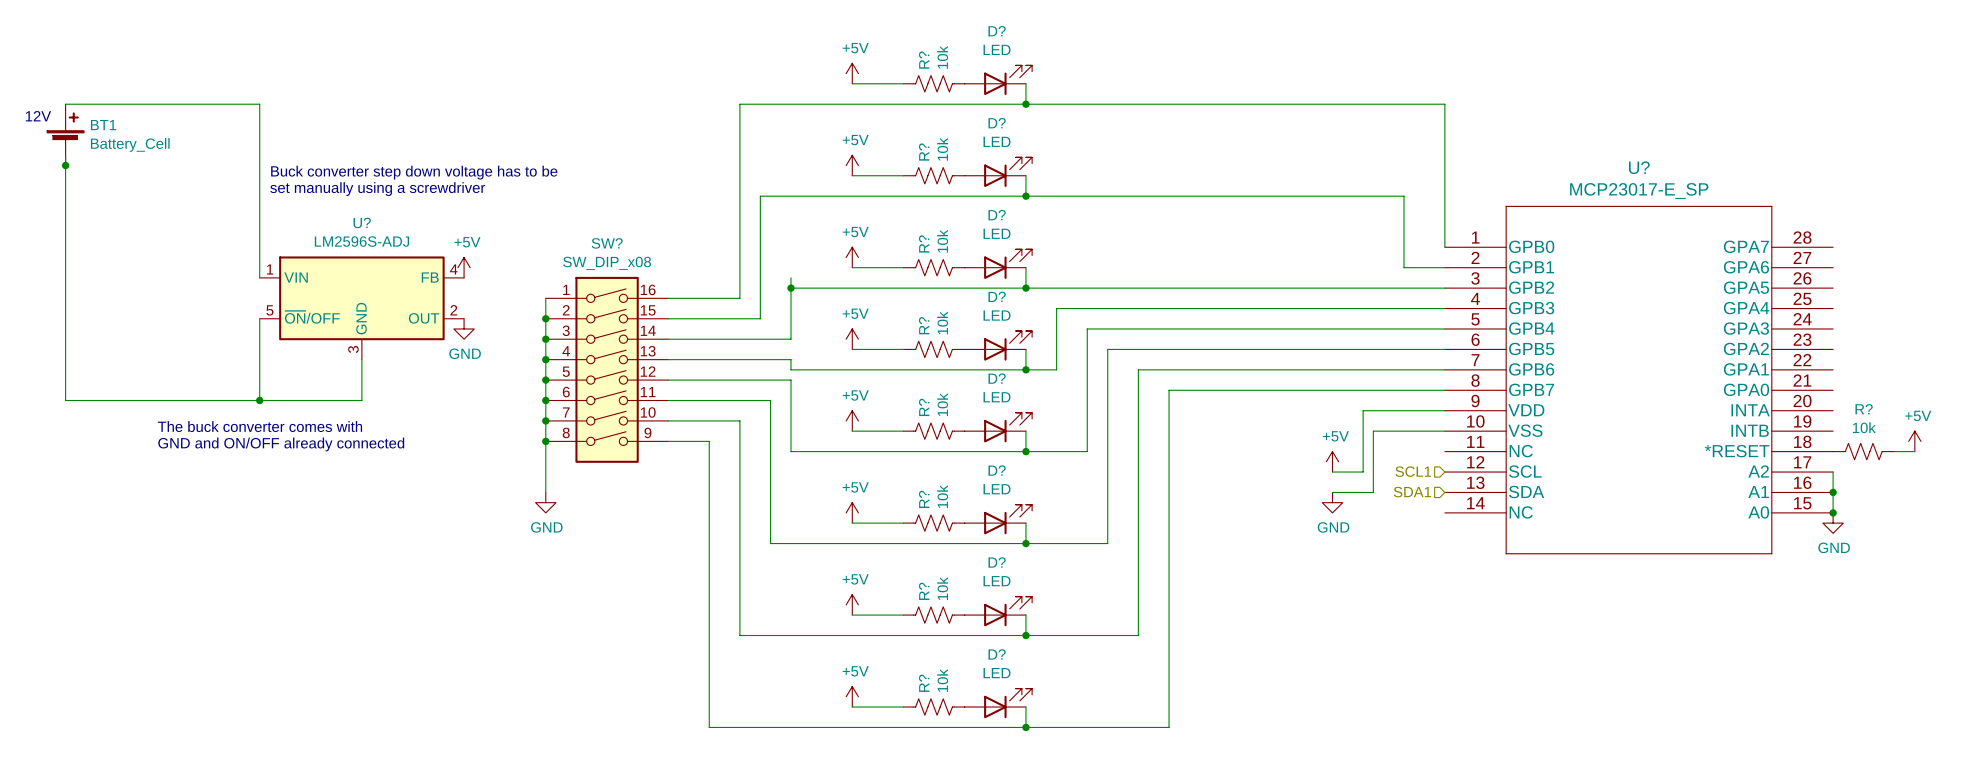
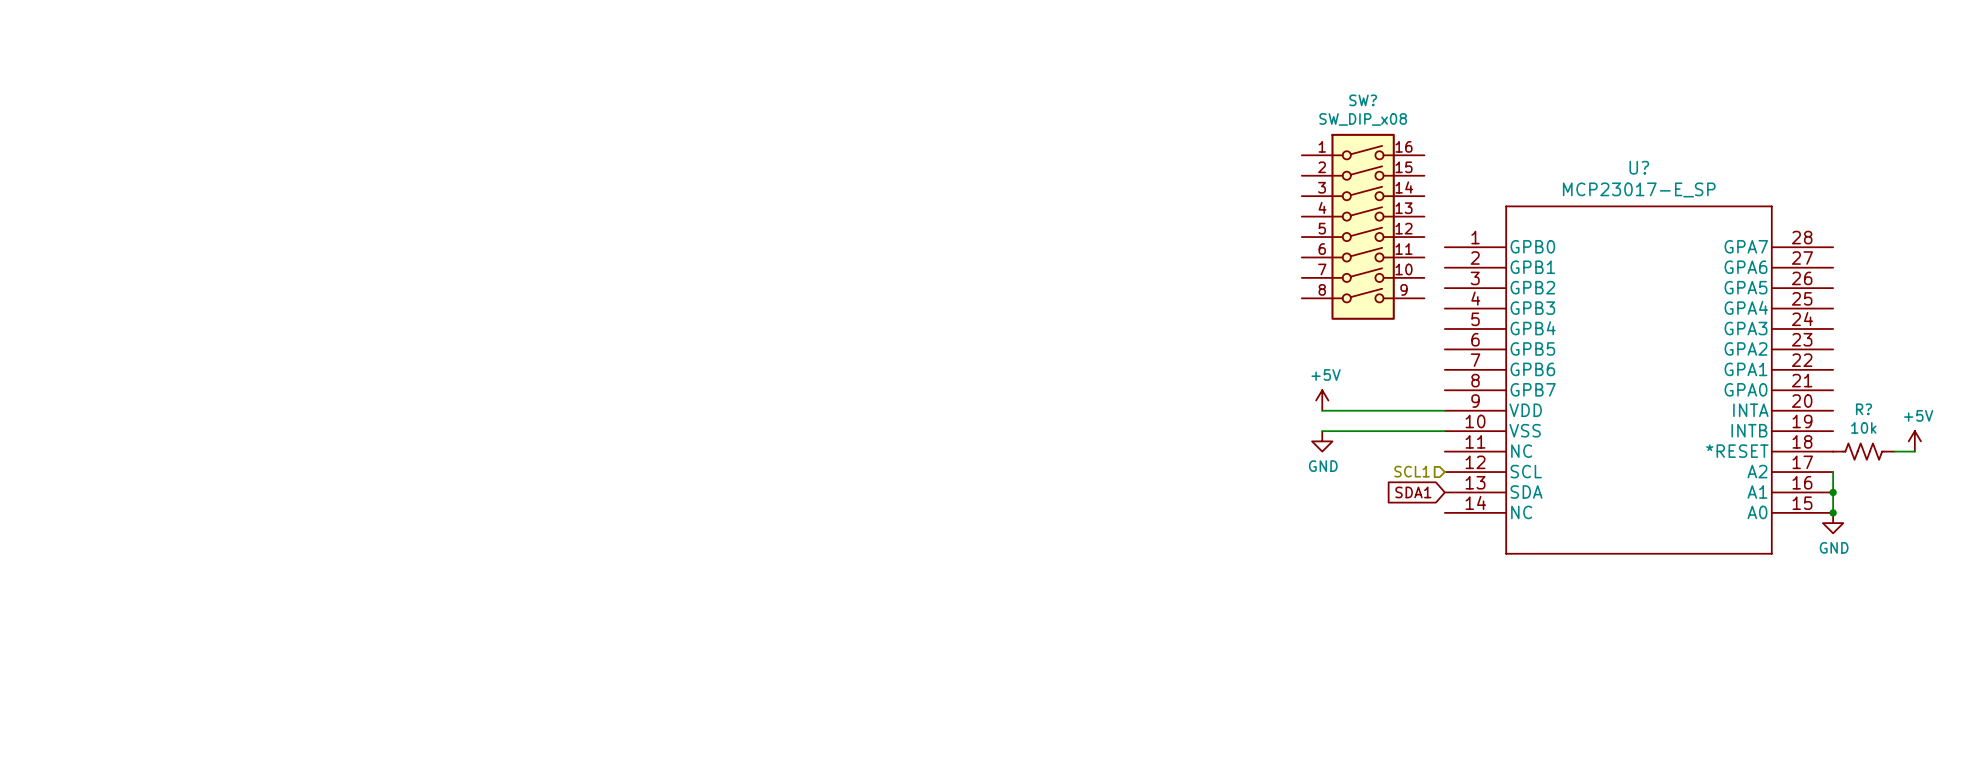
power symbol: +5V (852, 73) -> none
D?: LED (998, 80) -> none
wire: (852, 83) (903, 83) -> none
R?: 10k (934, 83) -> none
wire: (1025, 83) (1025, 104) -> none
wire: (65, 104) (259, 104) (259, 277) -> none
junction: (1025, 104) -> none
text: 12V (38, 116) -> none
BT1: Battery_Cell (65, 134) -> none
wire: (65, 155) (65, 400) (361, 400) (361, 359) -> none
junction: (65, 165) -> none
power symbol: +5V (852, 165) -> none
text: Buck converter step down voltage has to be (414, 172) -> none
D?: LED (998, 172) -> none
wire: (852, 175) (903, 175) -> none
R?: 10k (934, 175) -> none
wire: (1025, 175) (1025, 196) -> none
text: set manually using a screwdriver (377, 189) -> none
junction: (1025, 196) -> none
SW?: none -> SW_DIP_x08 (1363, 226)
wire: (1444, 247) (1444, 104) (739, 104) (739, 298) (668, 298) -> none
power symbol: +5V (852, 257) -> none
D?: LED (998, 264) -> none
power symbol: +5V (464, 267) -> none
wire: (852, 267) (903, 267) -> none
R?: 10k (934, 267) -> none
wire: (1025, 267) (1025, 288) -> none
wire: (1444, 267) (1404, 267) (1404, 196) (760, 196) (760, 318) (668, 318) -> none
wire: (790, 277) (790, 339) (668, 339) -> none
wire: (790, 288) (1444, 288) -> none
junction: (790, 288) -> none
junction: (1025, 288) -> none
wire: (545, 298) (545, 492) -> none
U?: LM2596S-ADJ (361, 308) -> none
wire: (1444, 308) (1056, 308) (1056, 369) (790, 369) (790, 359) (668, 359) -> none
wire: (259, 318) (259, 400) -> none
junction: (545, 318) -> none
power symbol: GND (464, 328) -> none
wire: (1444, 328) (1087, 328) (1087, 451) (790, 451) (790, 380) (668, 380) -> none
junction: (545, 339) -> none
power symbol: +5V (852, 339) -> none
D?: LED (998, 345) -> none
wire: (852, 349) (903, 349) -> none
R?: 10k (934, 349) -> none
wire: (1025, 349) (1025, 369) -> none
wire: (1444, 349) (1107, 349) (1107, 543) (770, 543) (770, 400) (668, 400) -> none
junction: (545, 359) -> none
SW?: SW_DIP_x08 (607, 369) -> none
junction: (1025, 369) -> none
wire: (1444, 369) (1138, 369) (1138, 635) (739, 635) (739, 420) (668, 420) -> none
junction: (545, 380) -> none
wire: (1444, 390) (1169, 390) (1169, 727) (709, 727) (709, 441) (668, 441) -> none
junction: (259, 400) -> none
junction: (545, 400) -> none
wire: (1363, 410) (1363, 472) (1332, 472) -> (1363, 410) (1322, 410)
junction: (545, 420) -> none
power symbol: +5V (852, 420) -> none
text: The buck converter comes with (259, 426) -> none
D?: LED (998, 427) -> none
wire: (852, 431) (903, 431) -> none
R?: 10k (934, 431) -> none
wire: (1025, 431) (1025, 451) -> none
wire: (1373, 431) (1373, 492) (1332, 492) -> (1373, 431) (1322, 431)
junction: (545, 441) -> none
text: GND and ON/OFF already connected (281, 444) -> none
junction: (1025, 451) -> none
power symbol position: +5V (1332, 461) -> +5V (1322, 400)
hierarchical label: SDA1 (1412, 492) -> none
global label: none -> SDA1 (1413, 492)
power symbol: GND (545, 502) -> none
power symbol position: GND (1332, 502) -> GND (1322, 441)
power symbol: +5V (852, 512) -> none
D?: LED (998, 519) -> none
wire: (852, 523) (903, 523) -> none
R?: 10k (934, 523) -> none
wire: (1025, 523) (1025, 543) -> none
junction: (1025, 543) -> none
power symbol: +5V (852, 604) -> none
D?: LED (998, 611) -> none
wire: (852, 615) (903, 615) -> none
R?: 10k (934, 615) -> none
wire: (1025, 615) (1025, 635) -> none
junction: (1025, 635) -> none
power symbol: +5V (852, 696) -> none
D?: LED (998, 703) -> none
wire: (852, 707) (903, 707) -> none
R?: 10k (934, 707) -> none
wire: (1025, 707) (1025, 727) -> none
junction: (1025, 727) -> none

